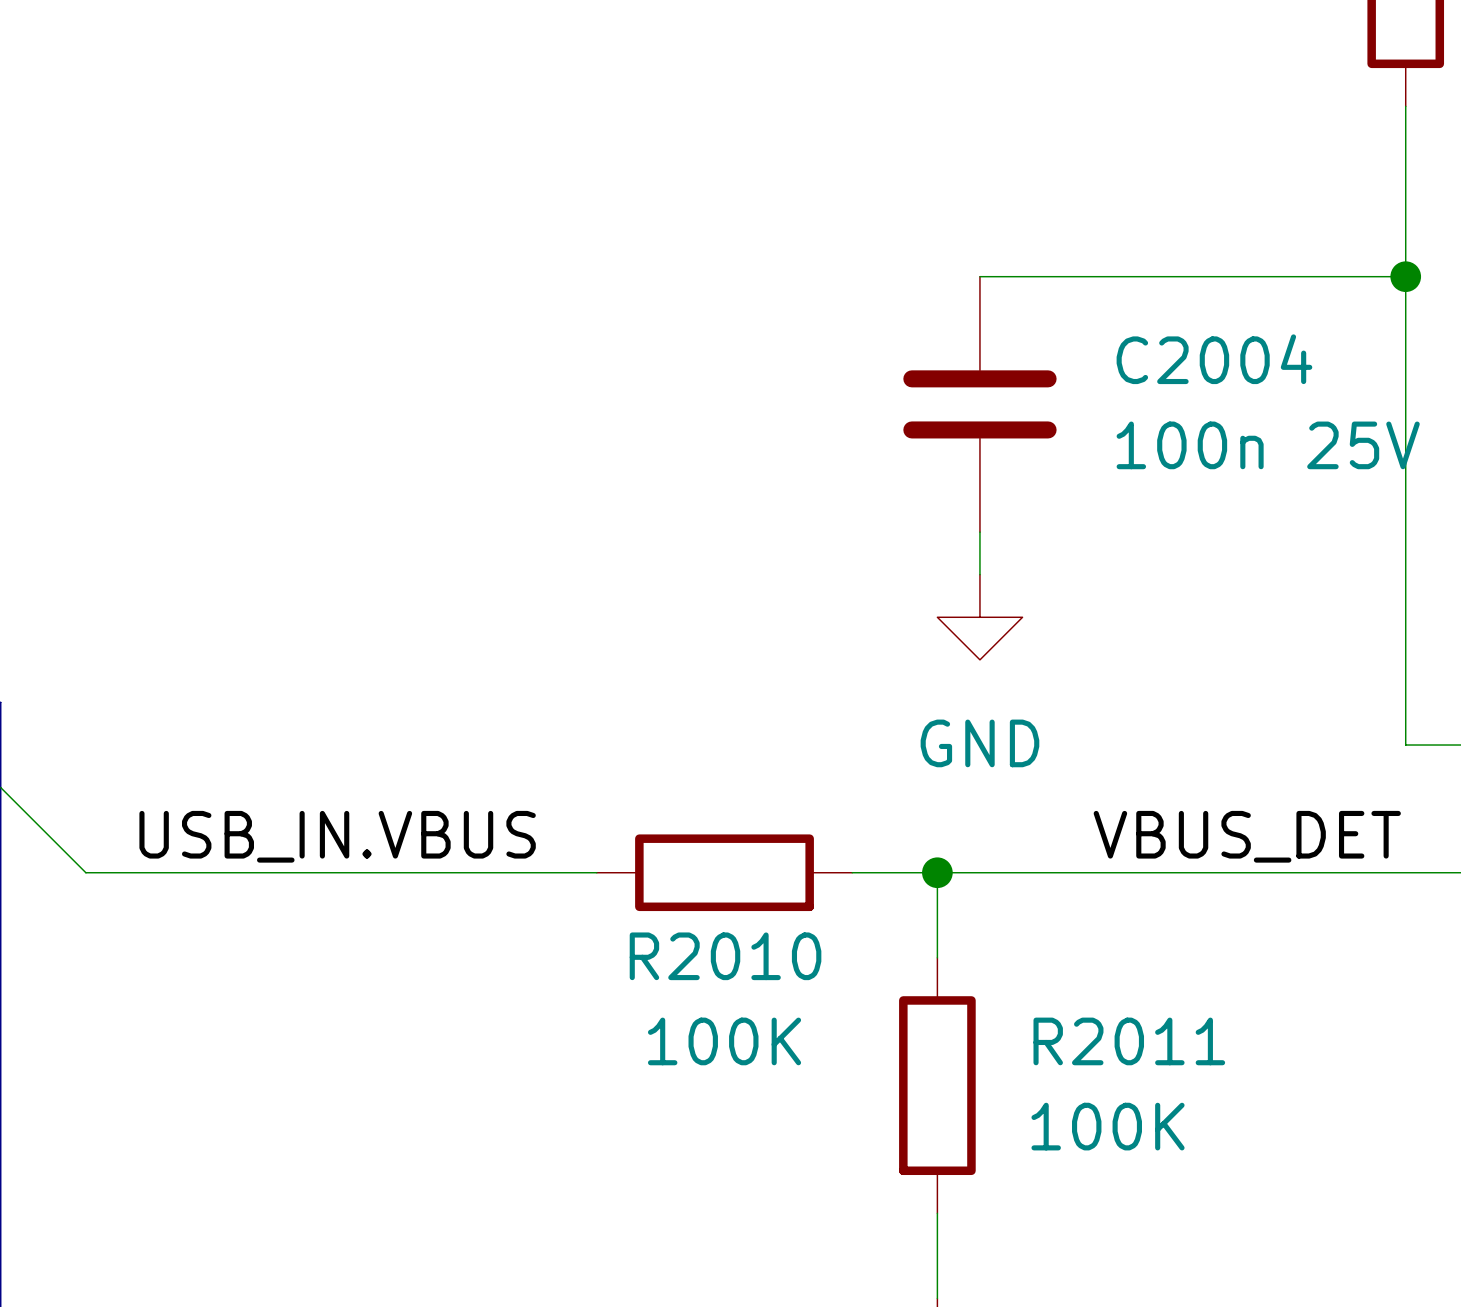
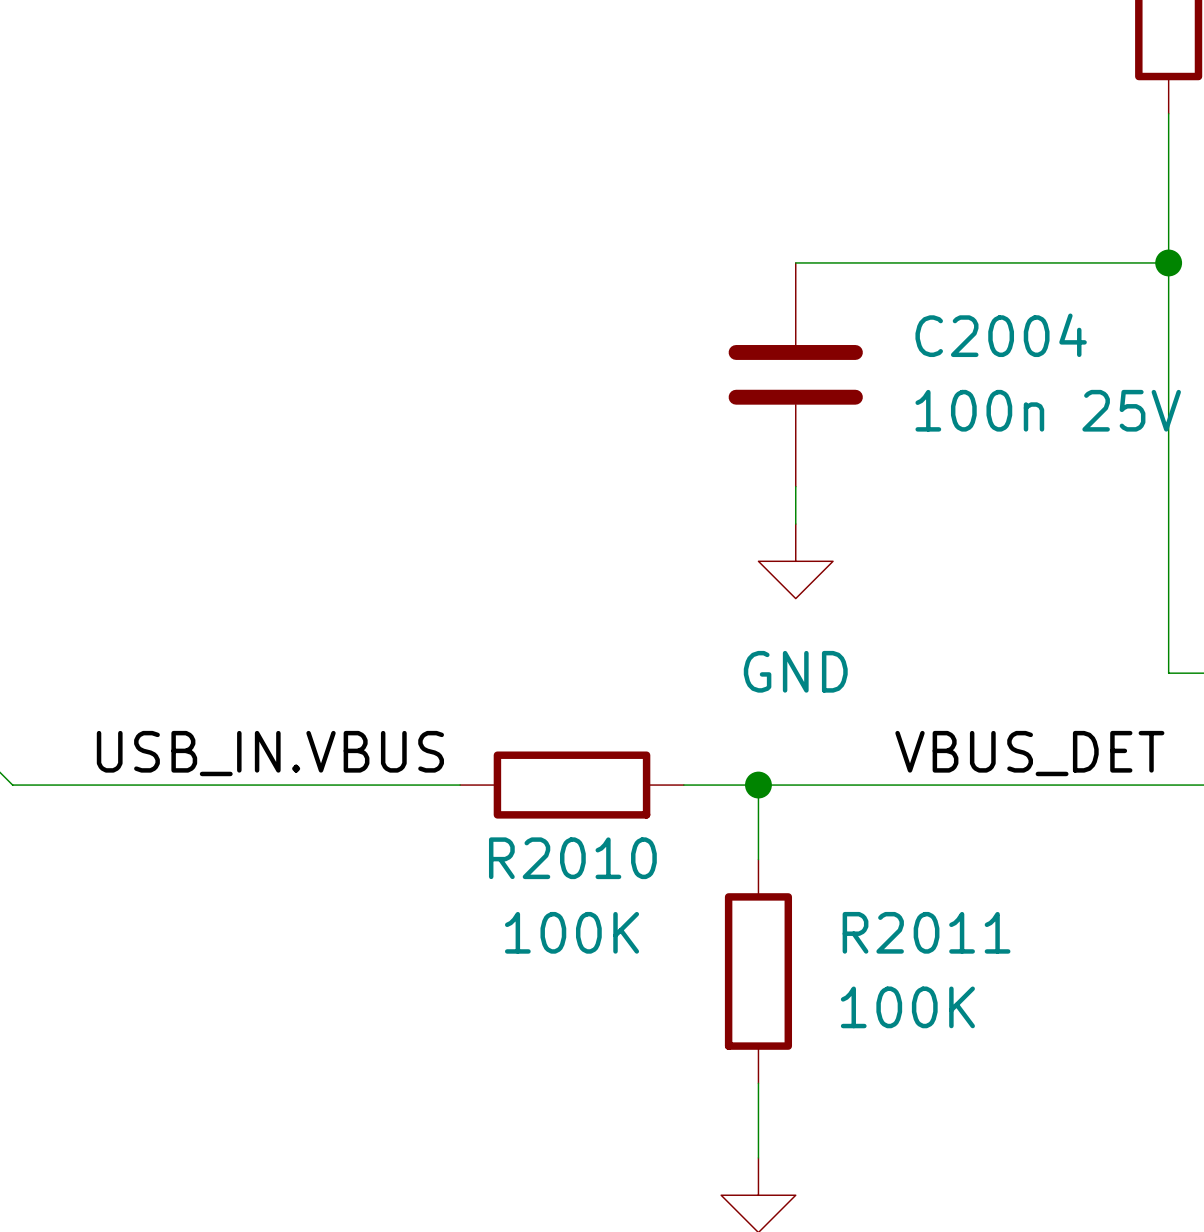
label position: USB_IN.VBUS (337, 836) -> USB_IN.VBUS (270, 753)

